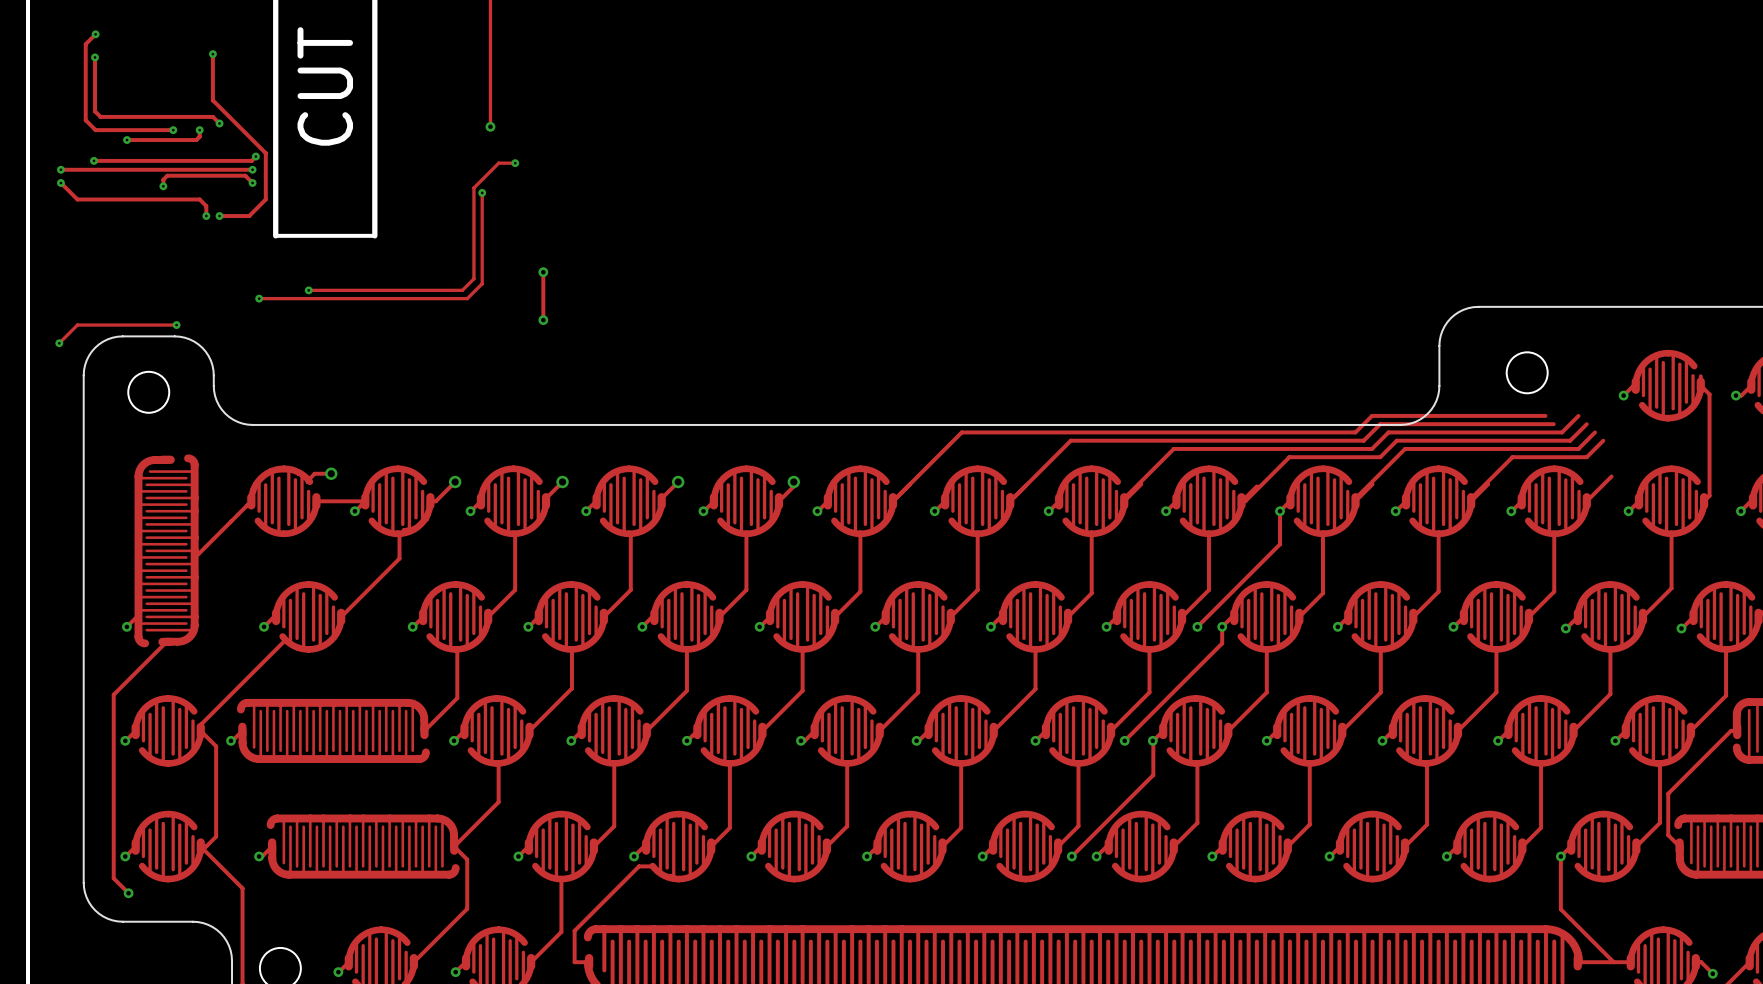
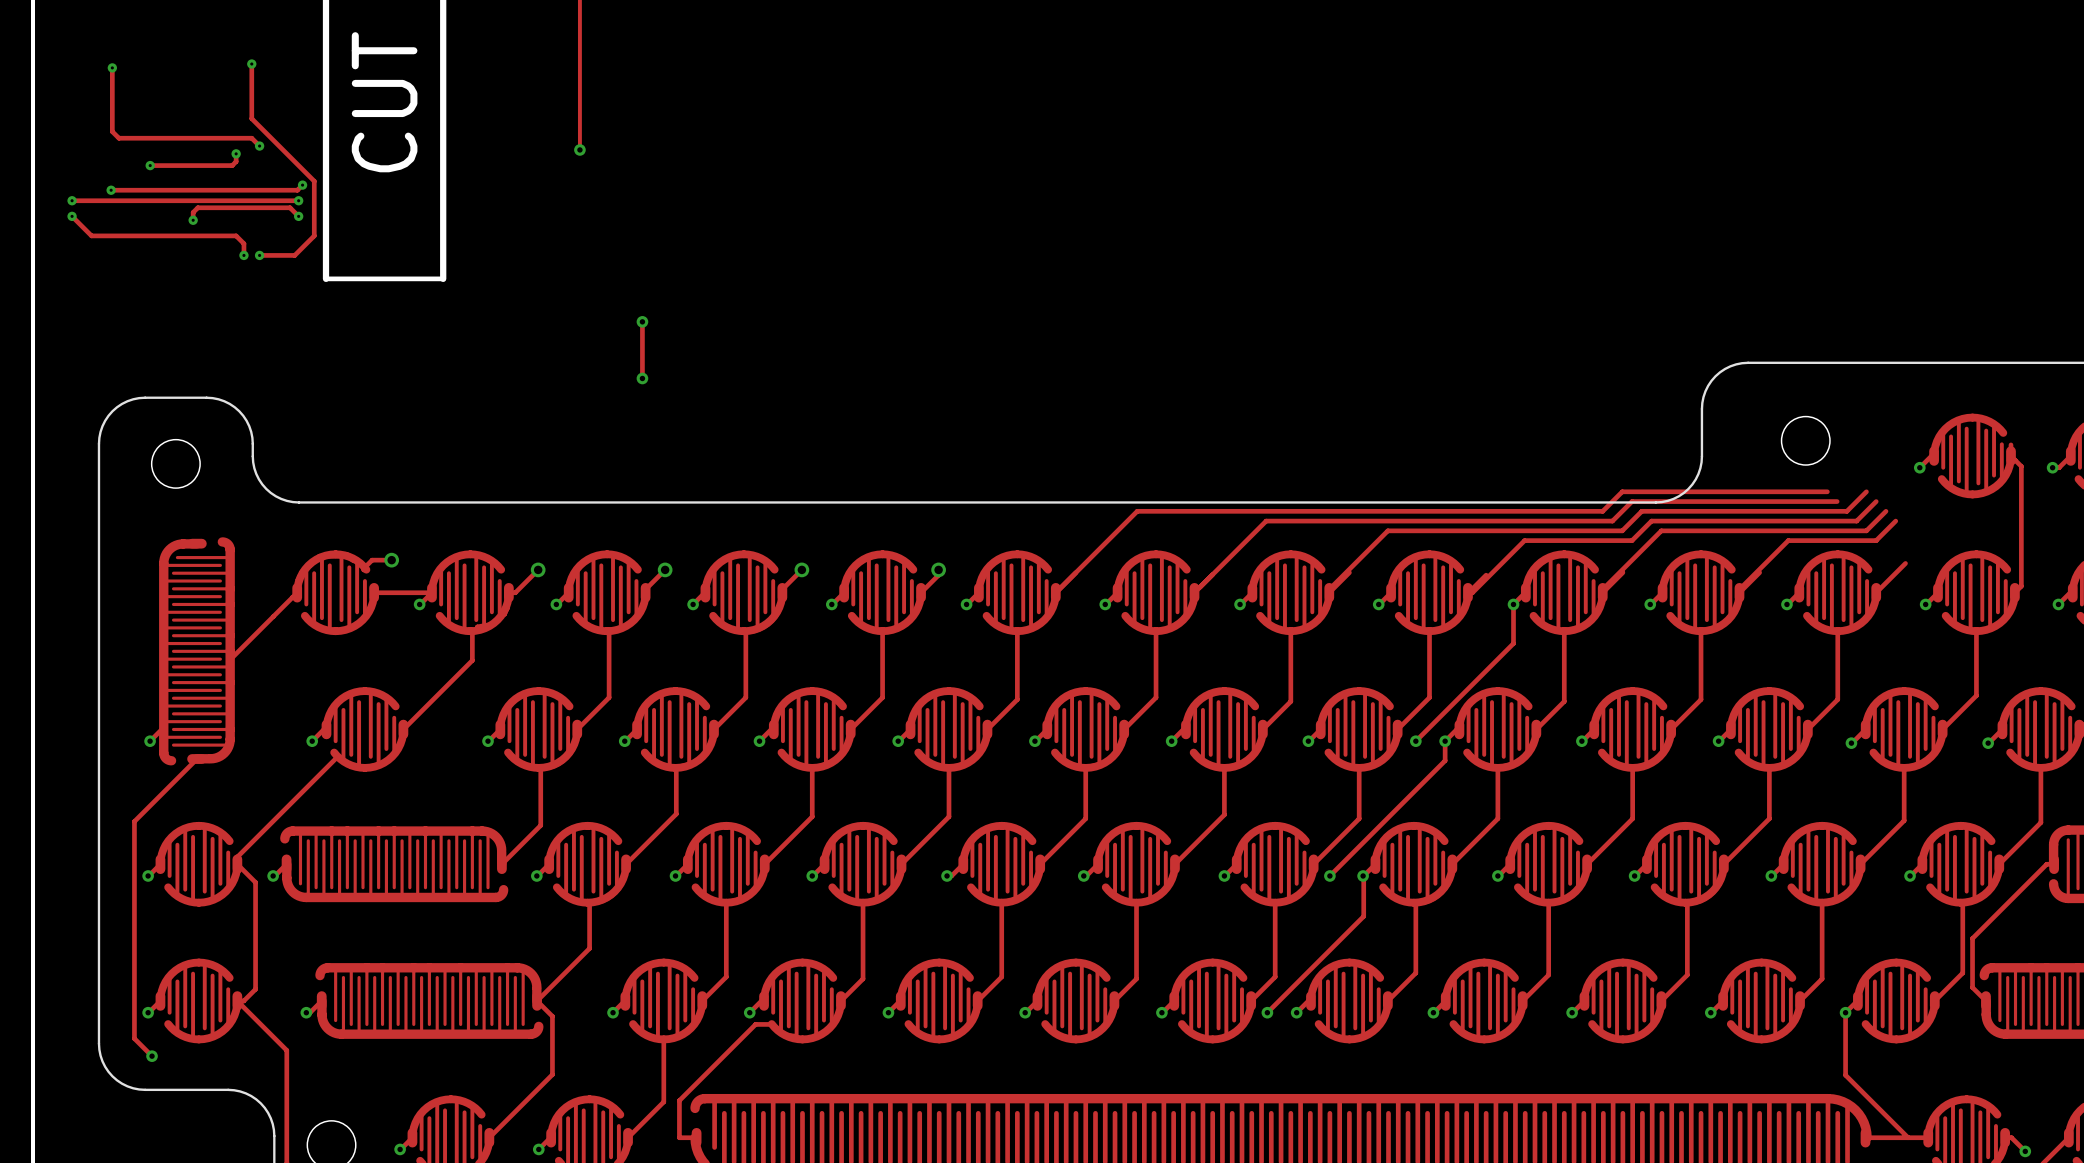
track: (95, 34) (85, 44) (85, 120) (95, 130) (173, 130) -> none
via: (95, 34) -> none
via: (173, 130) -> none
track: (515, 163) (498, 163) (473, 187) (473, 278) (462, 290) (308, 290) -> none
via: (515, 163) -> none
track: (482, 192) (482, 283) (467, 298) (259, 298) -> none
via: (482, 192) -> none
via: (308, 290) -> none
via: (259, 298) -> none
track: (176, 325) (77, 325) (59, 343) -> none
via: (176, 325) -> none
via: (59, 343) -> none

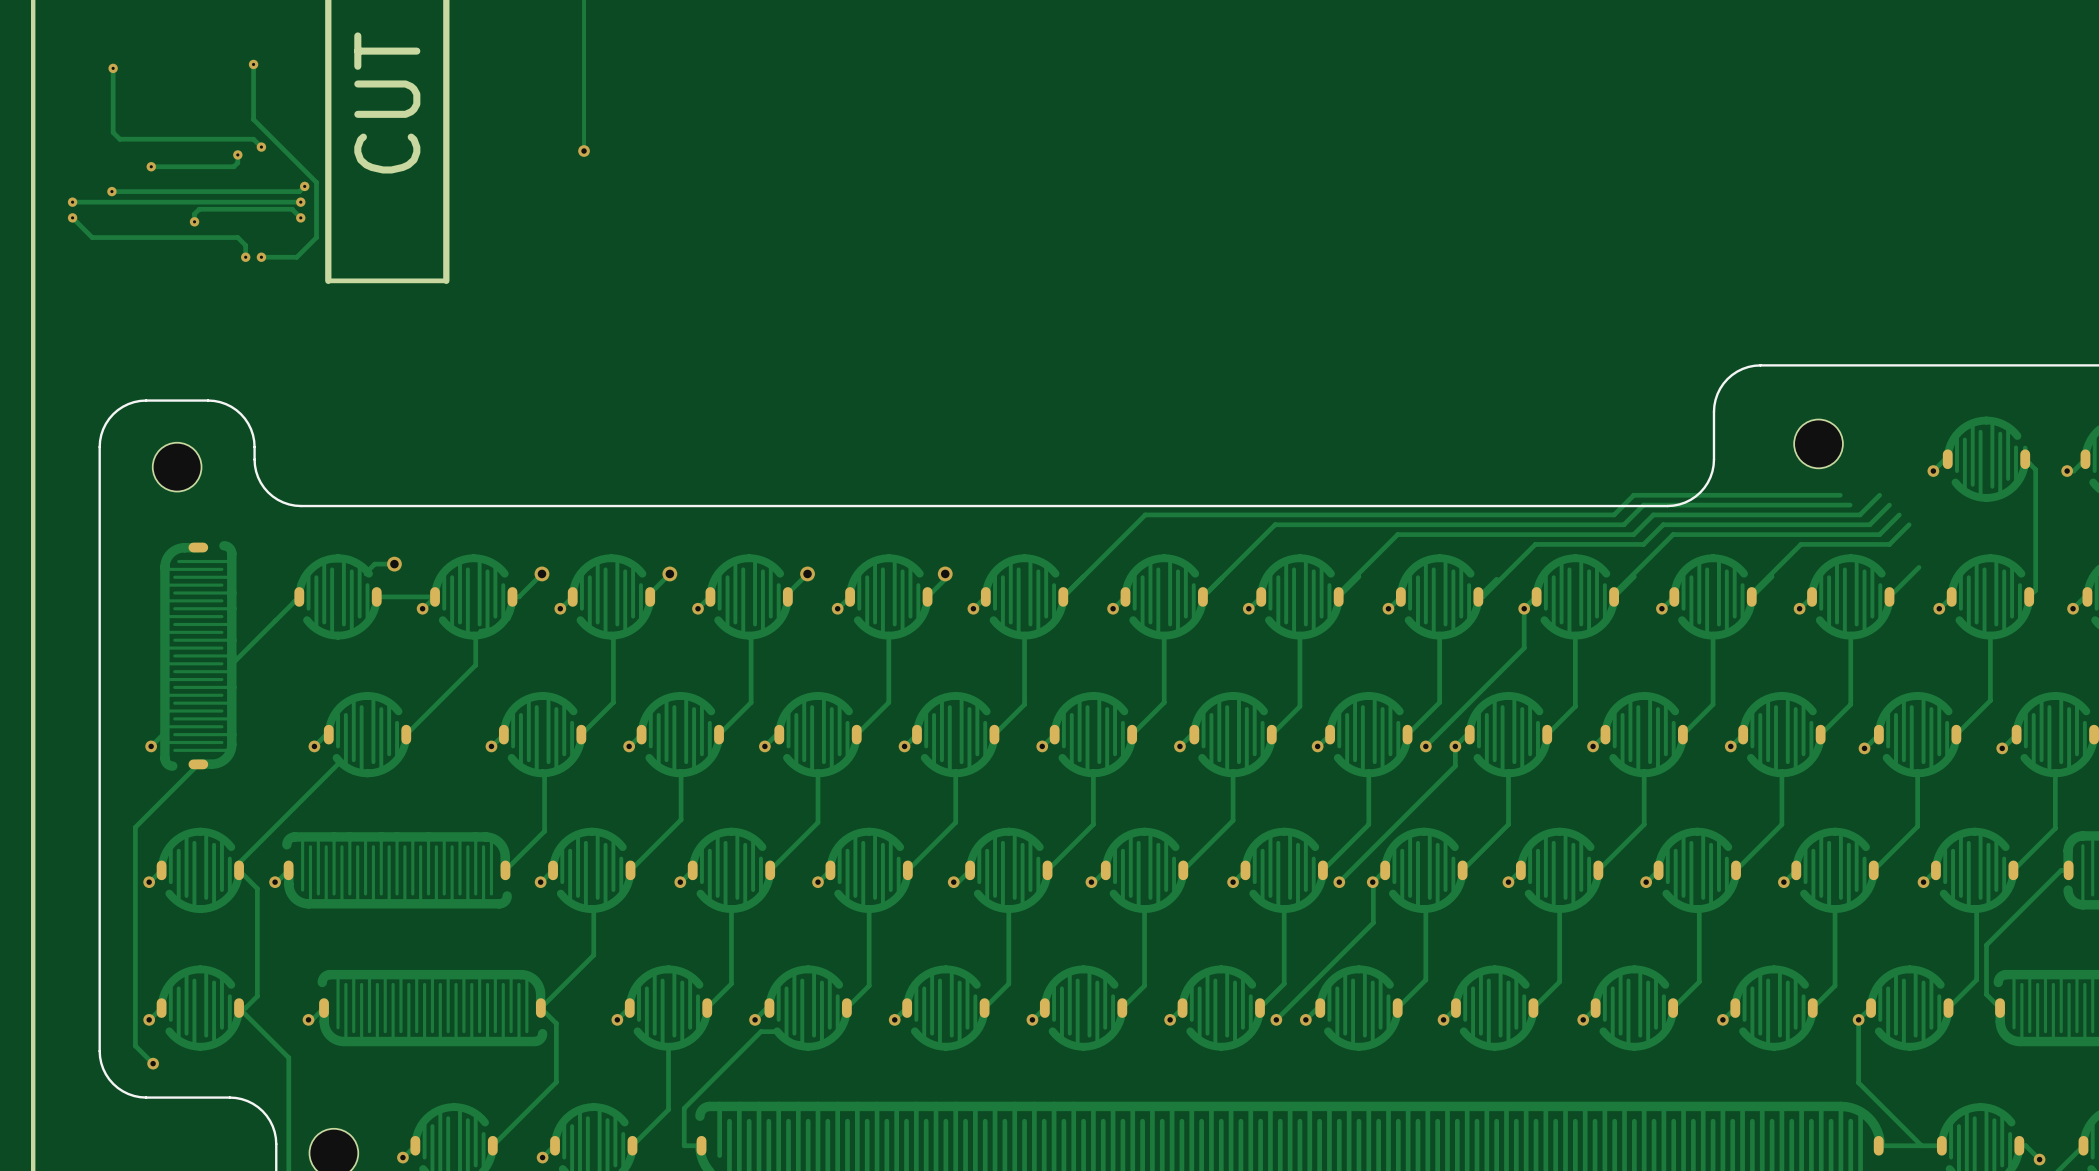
track: (642, 321) (642, 378) -> none
via: (642, 321) -> none
via: (642, 378) -> none

